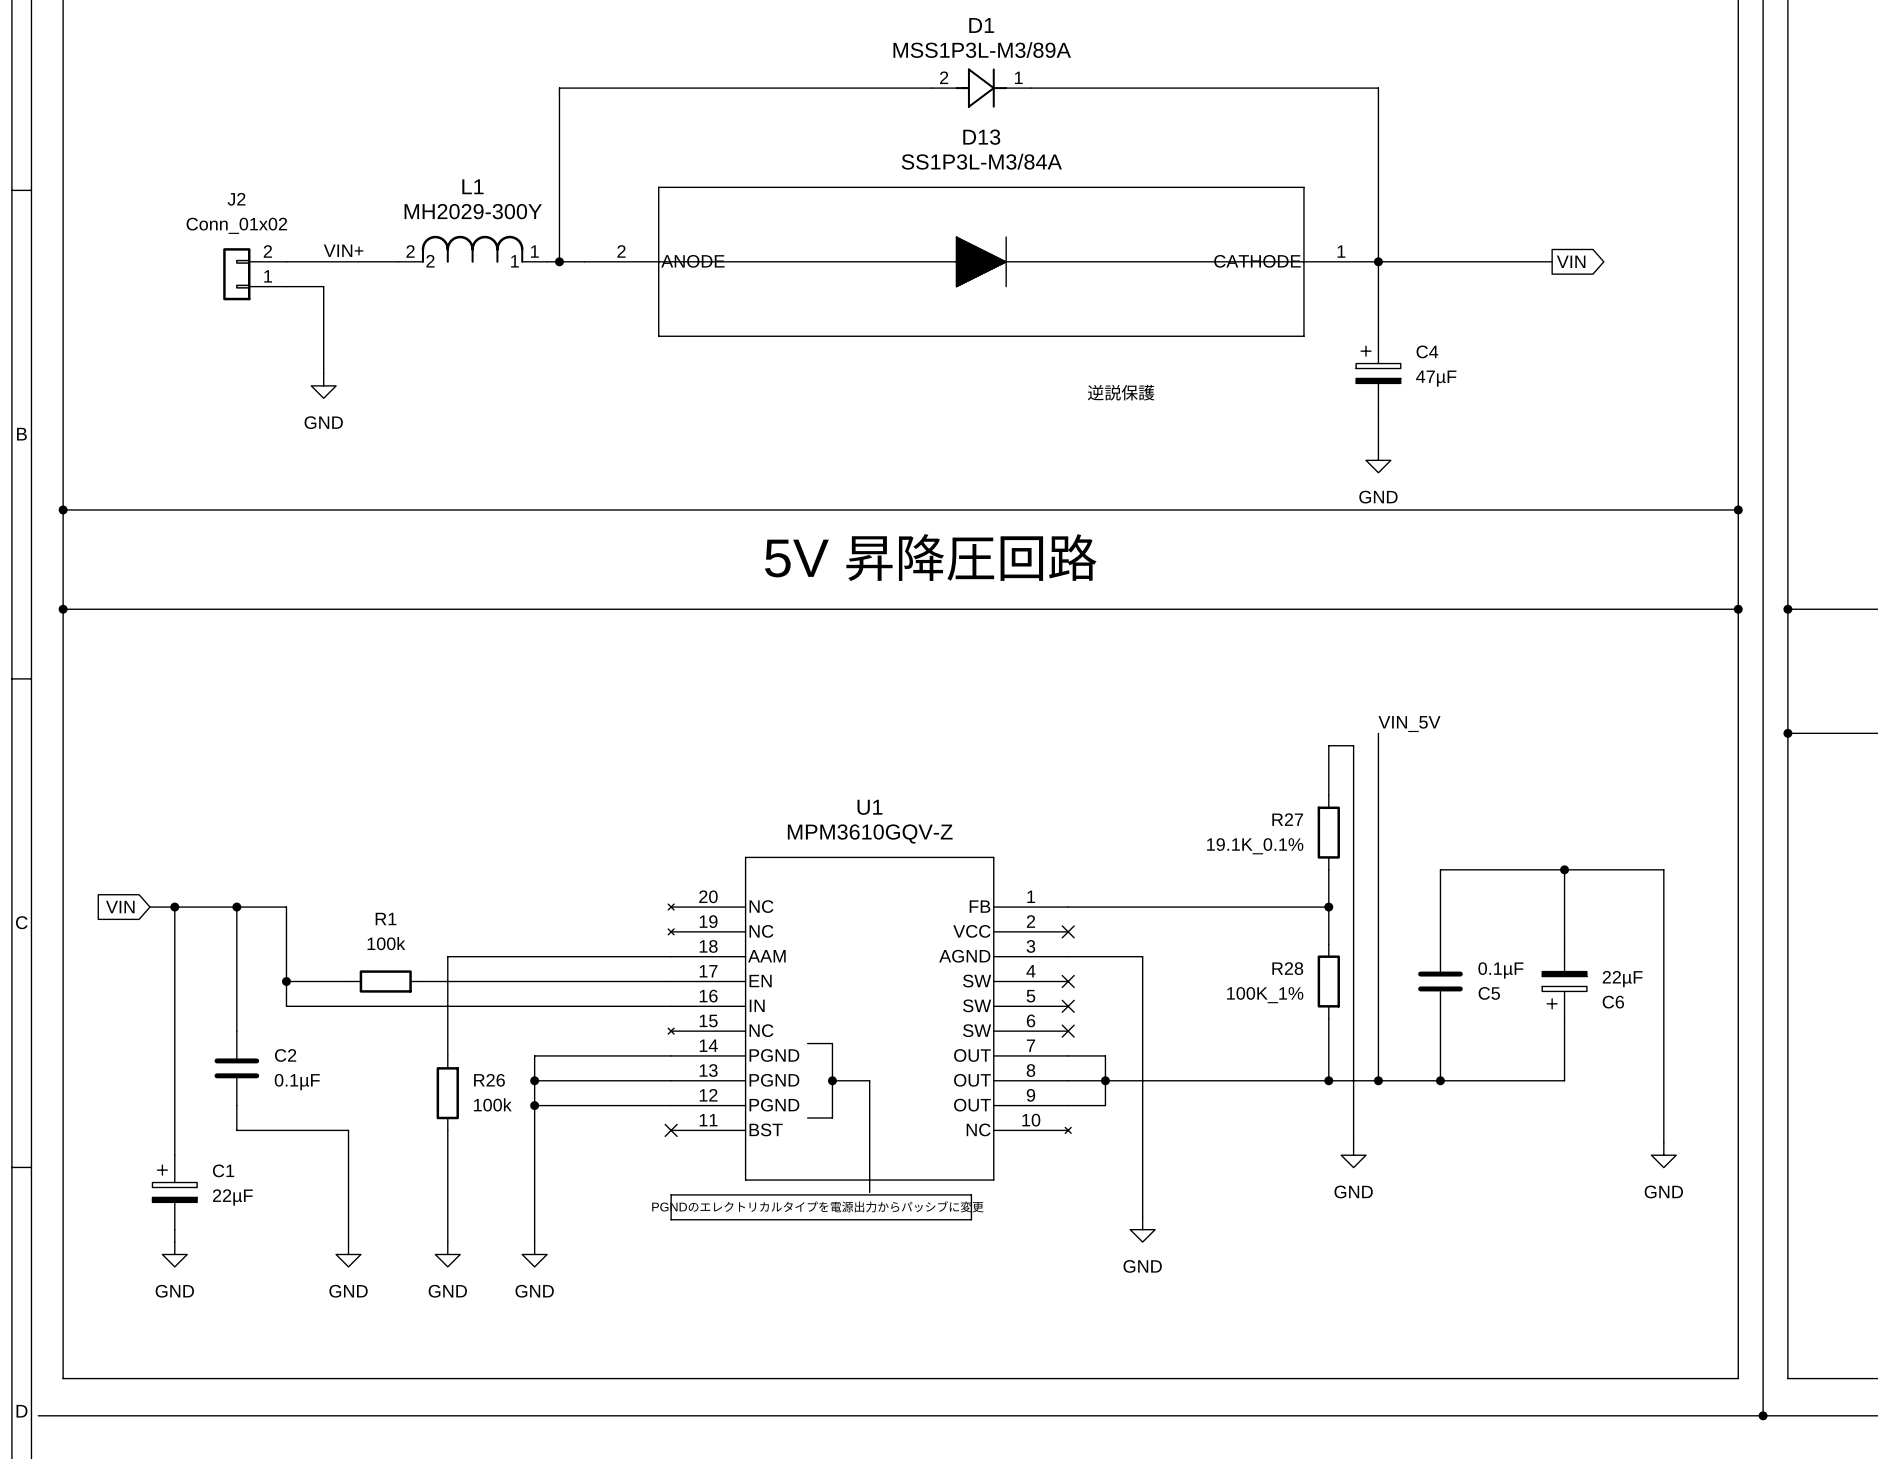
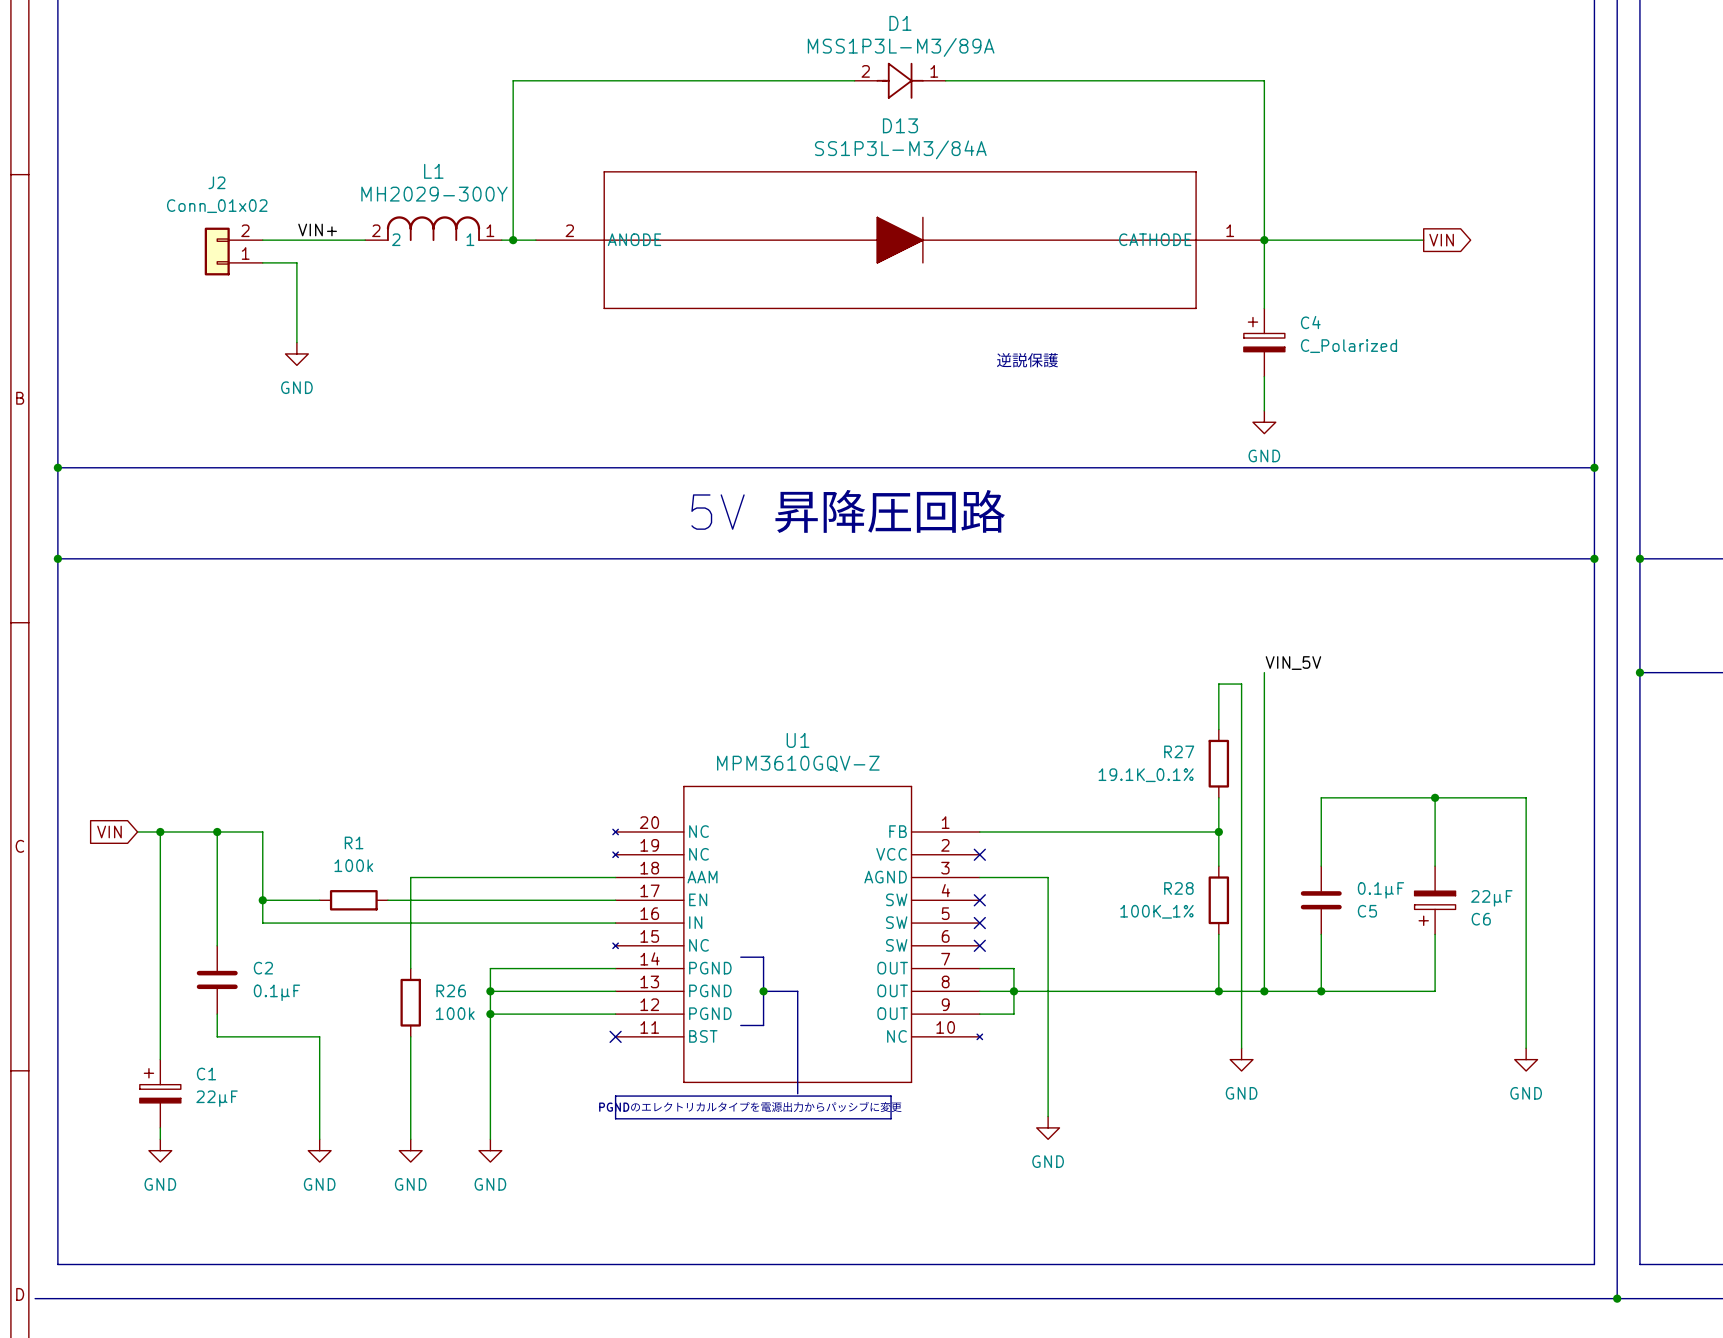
C4 value: 47µF (1436, 378) -> C_Polarized (1348, 346)

